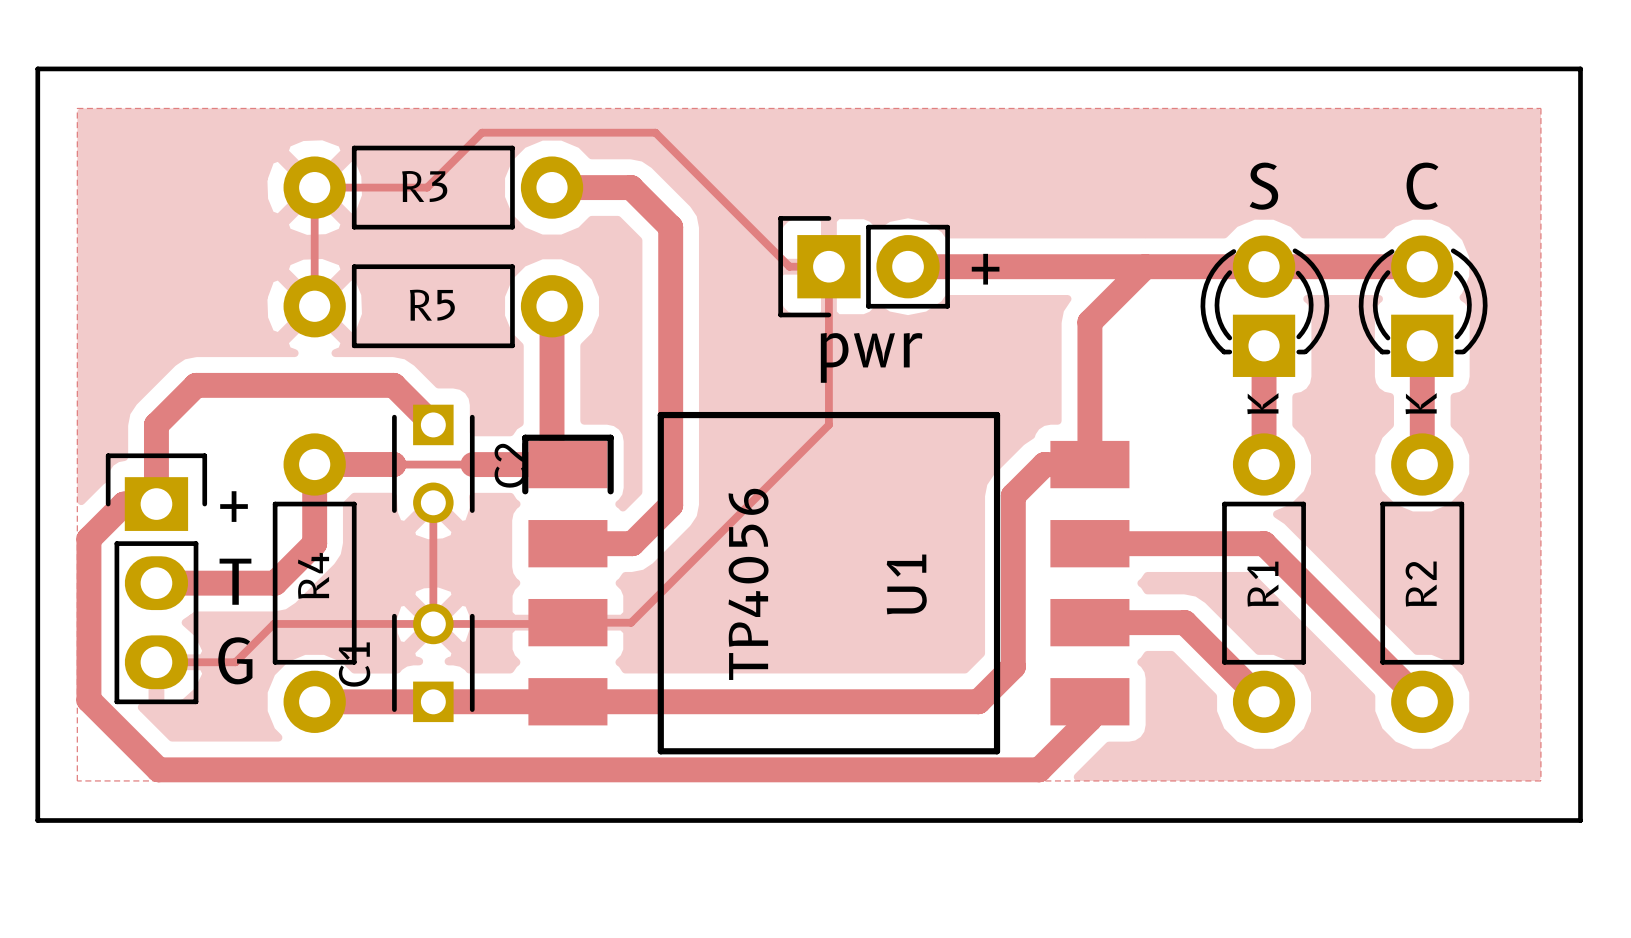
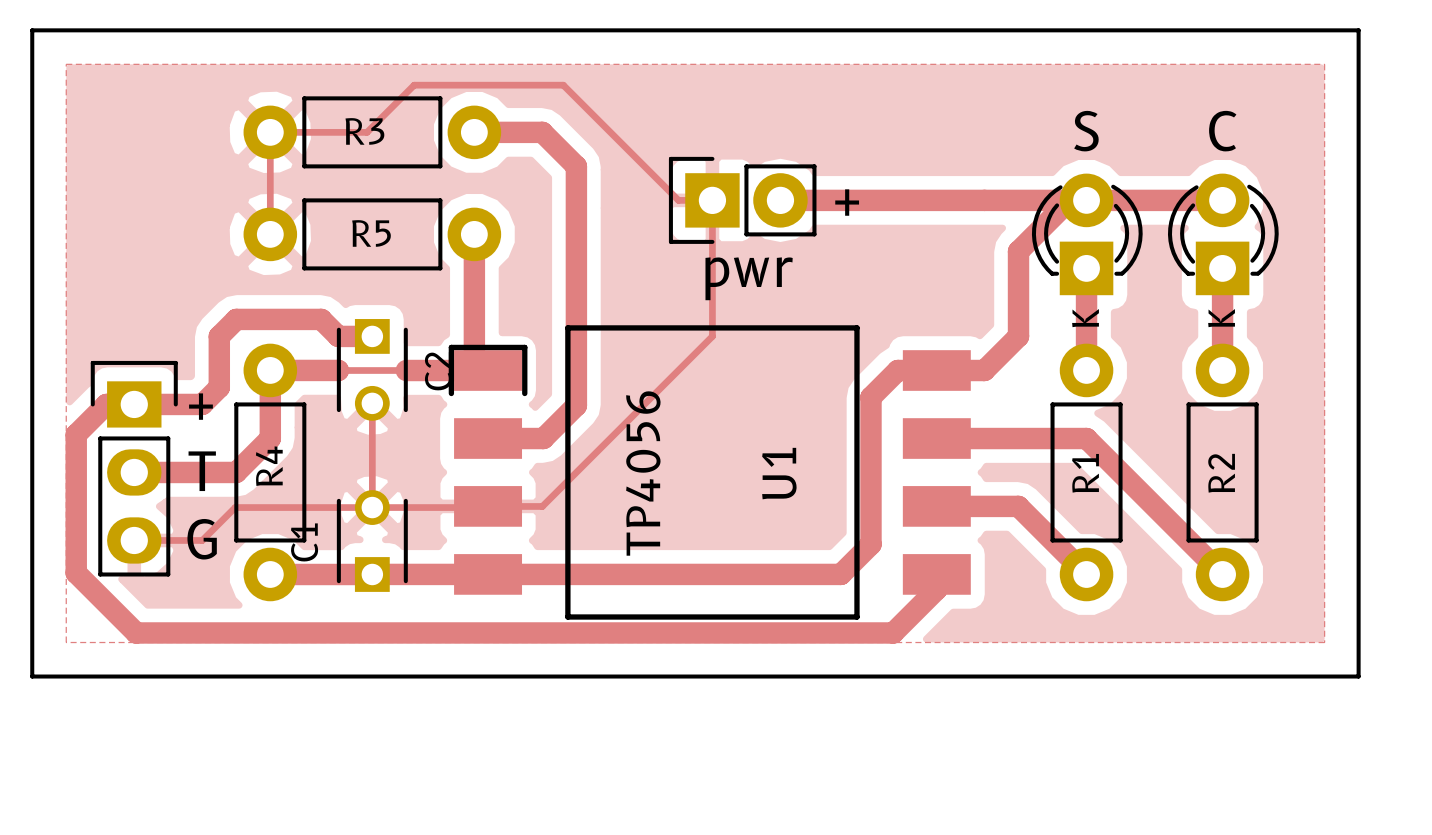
track: (1145, 266) (1089, 322) (1089, 464) -> (1069, 200) (1018, 251) (1018, 336) (984, 370) (936, 370)
track: (433, 424) (393, 385) (196, 385) (156, 424) (156, 504) -> (372, 336) (338, 336) (321, 319) (236, 319) (219, 336) (219, 387) (202, 404) (134, 404)

